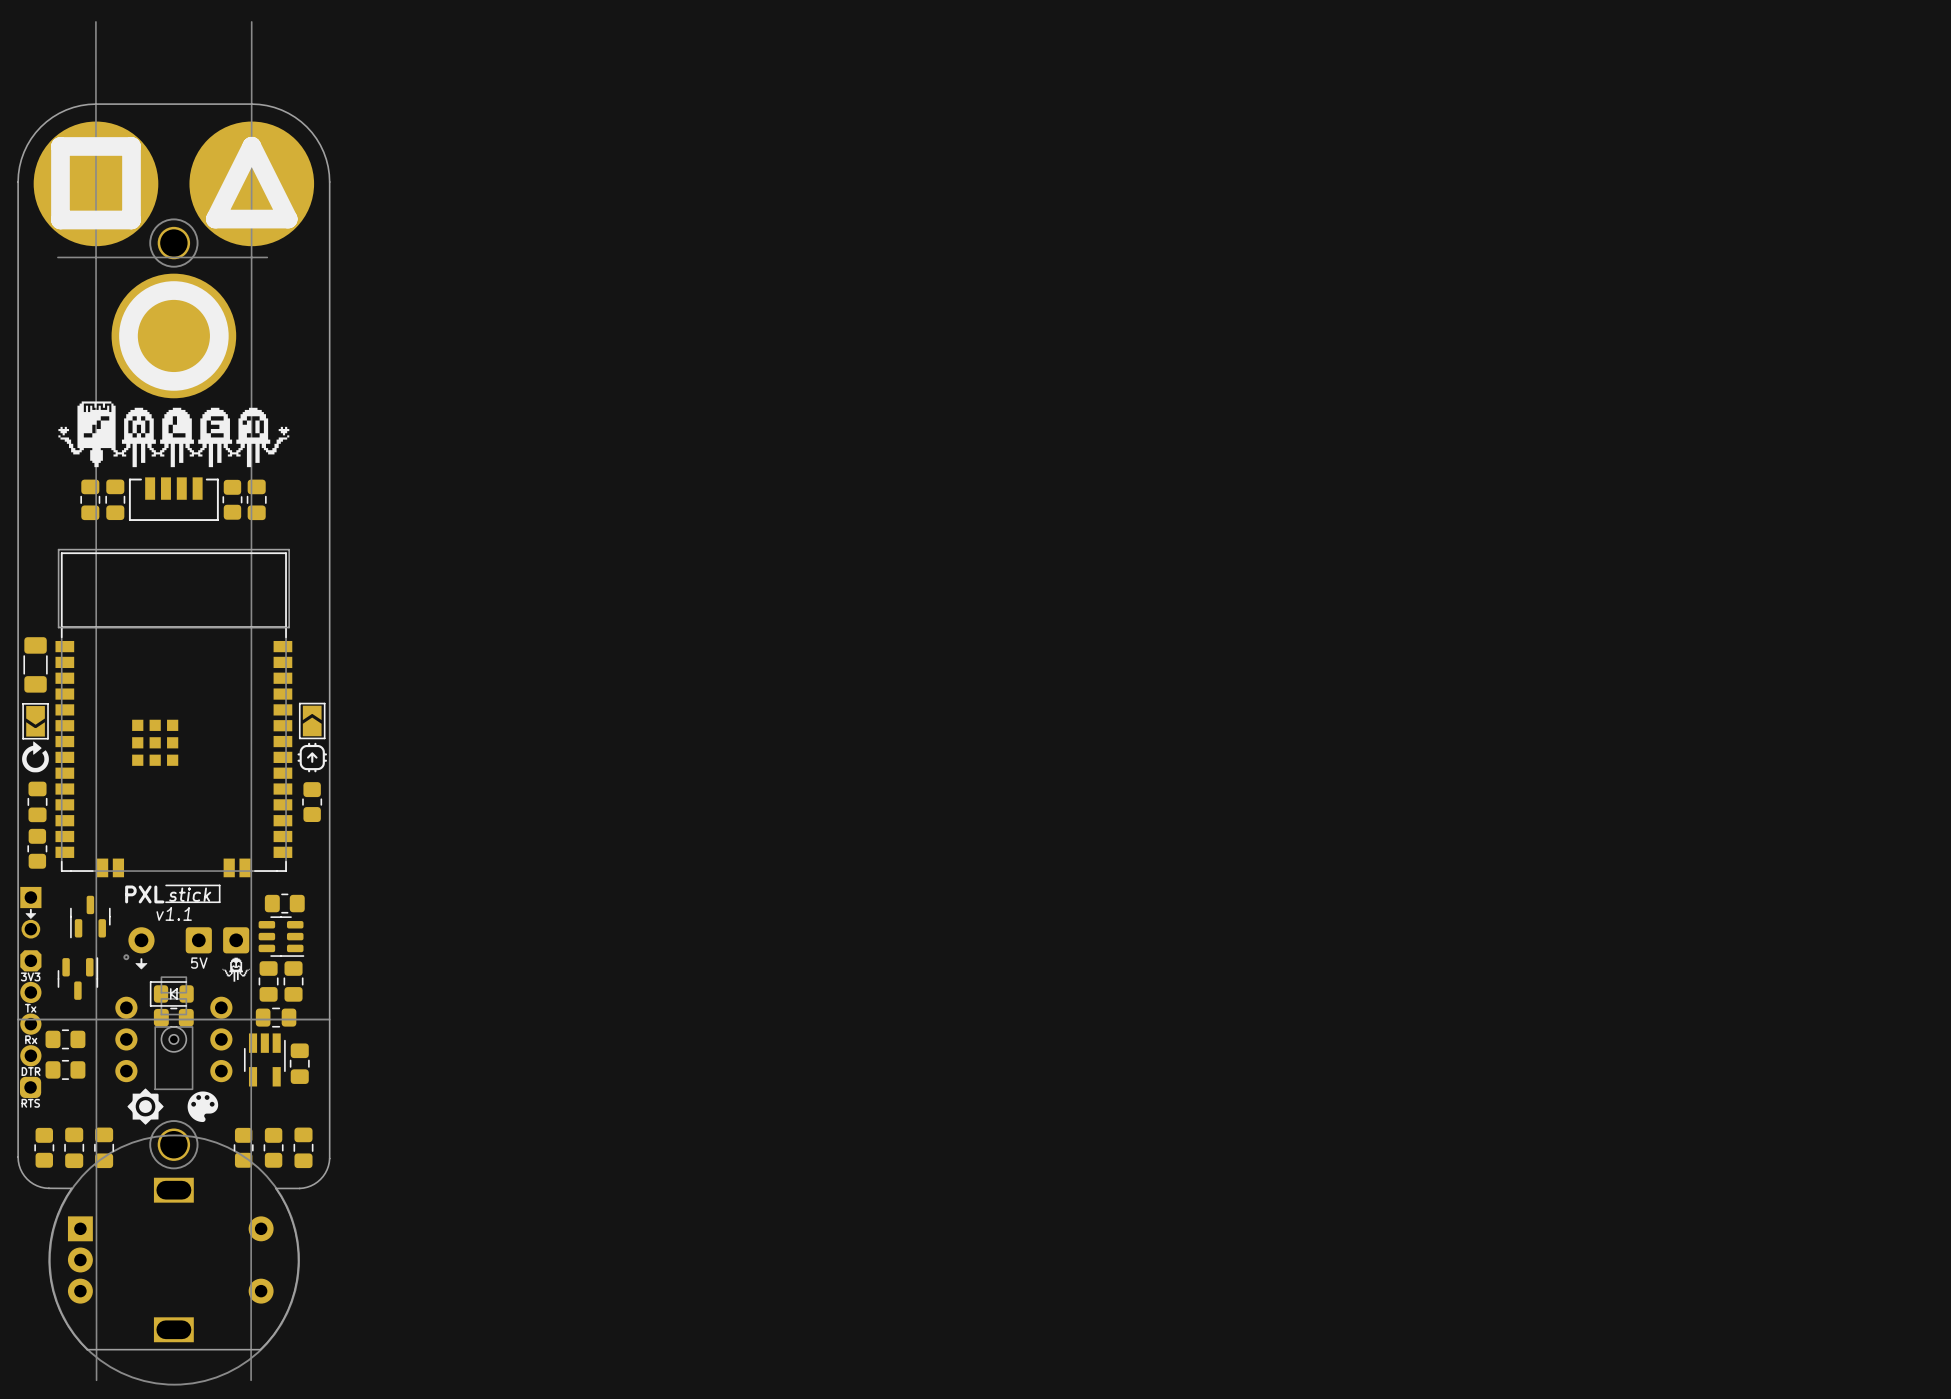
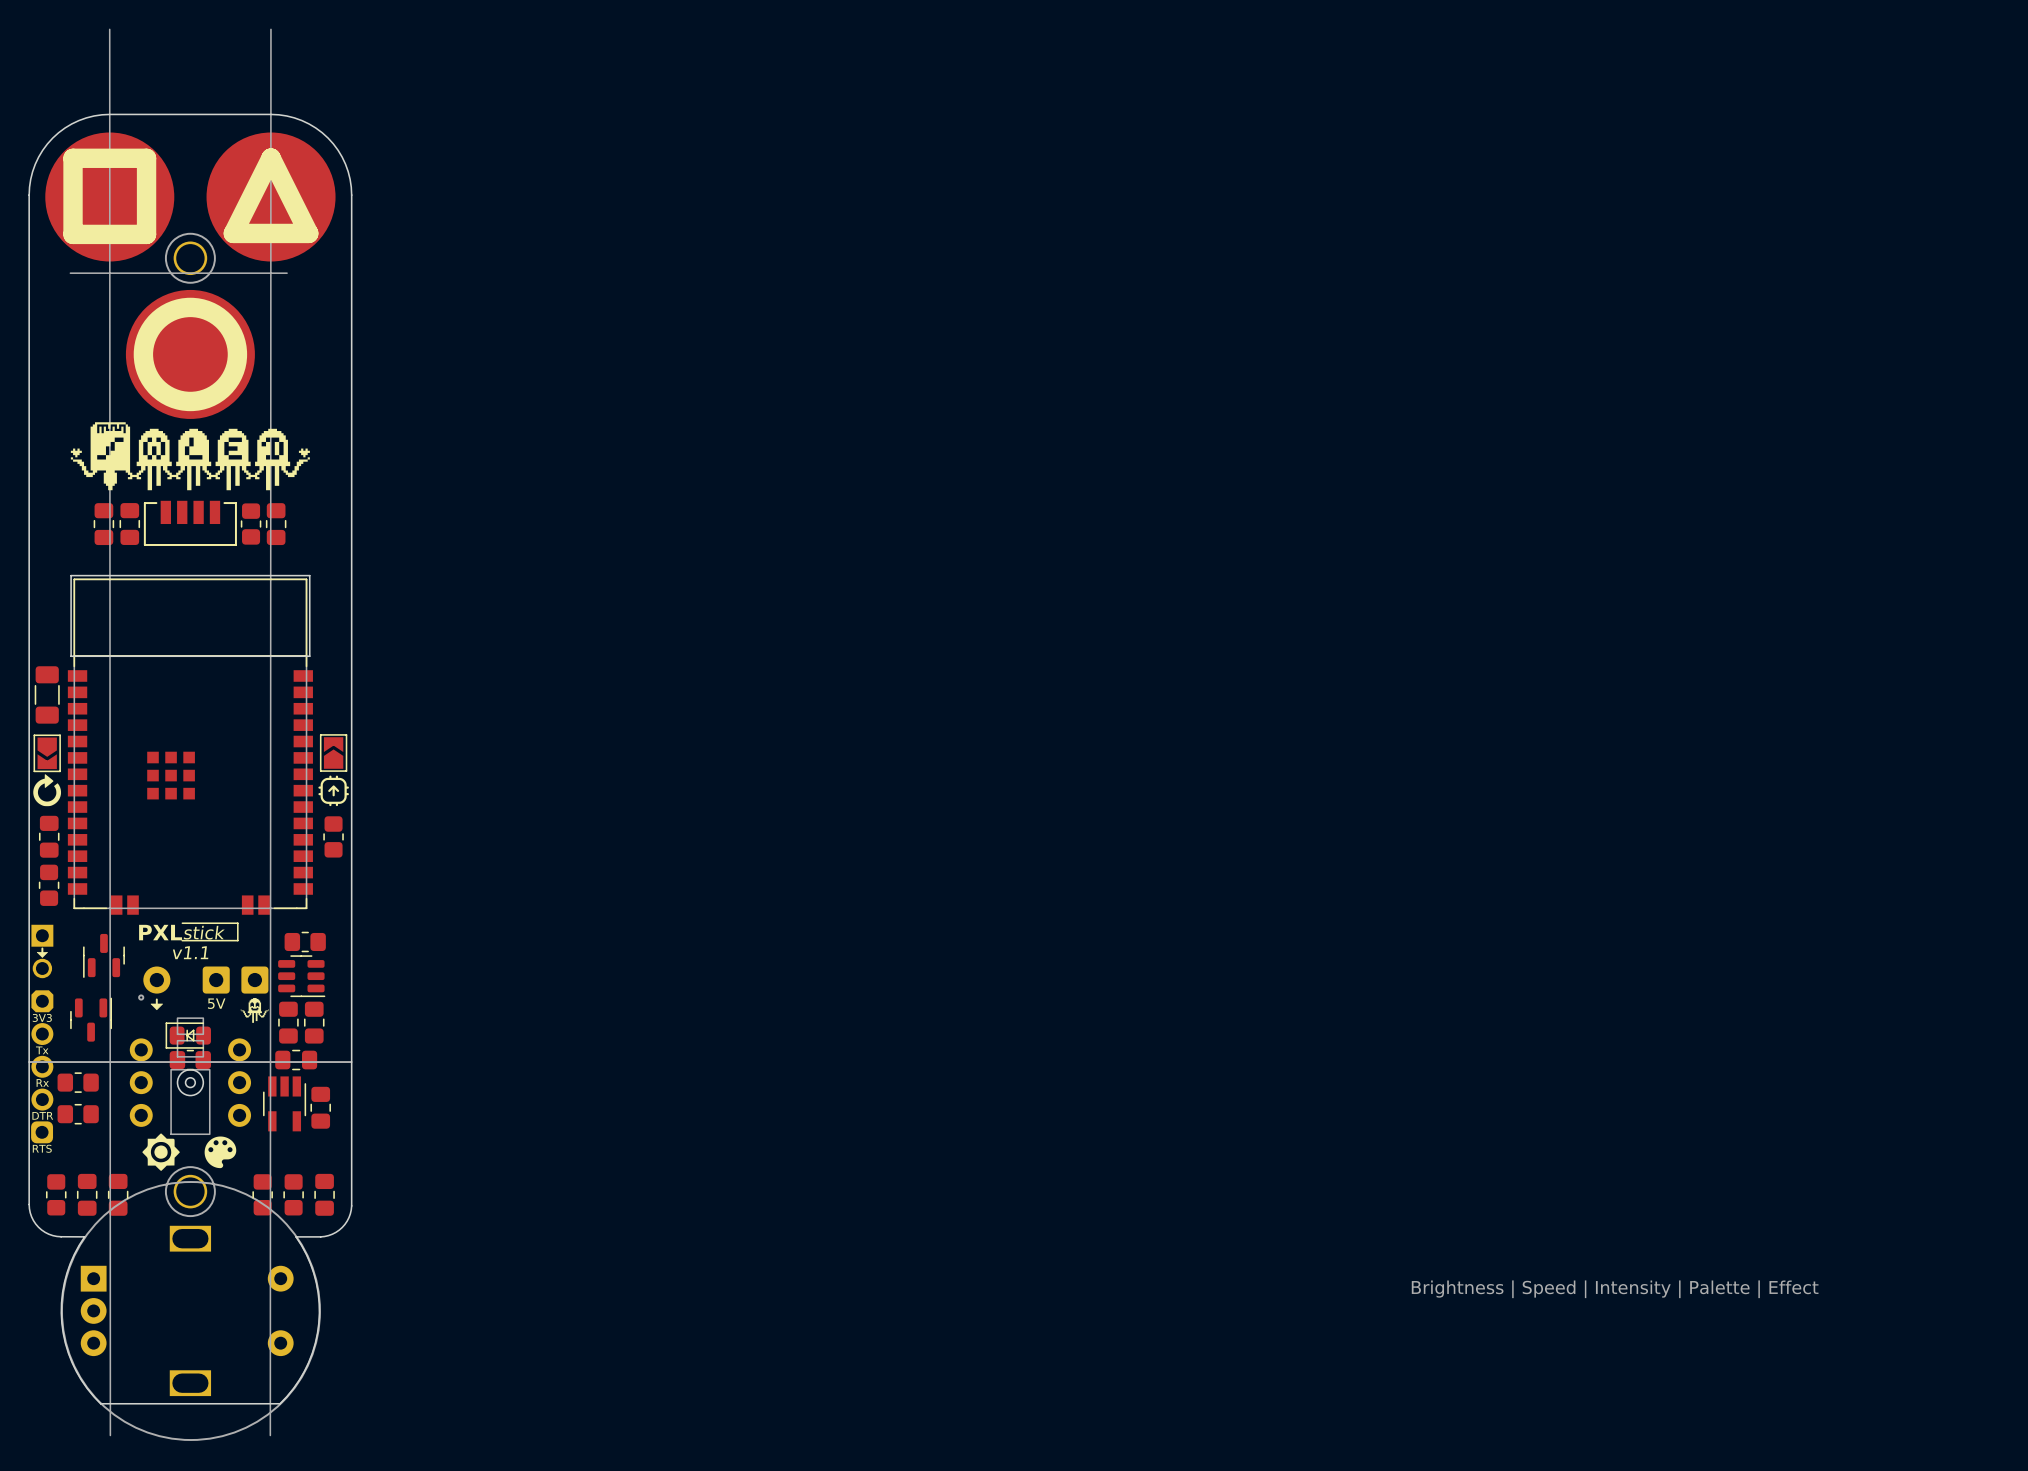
text: none -> Brightness | Speed | Intensity | Palette | Effect (1615, 1289)

